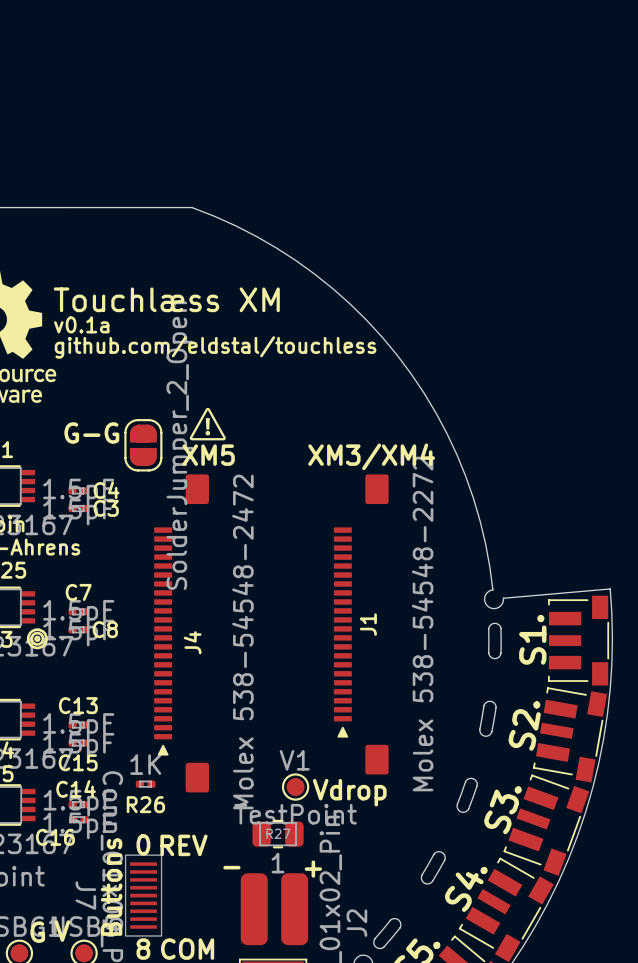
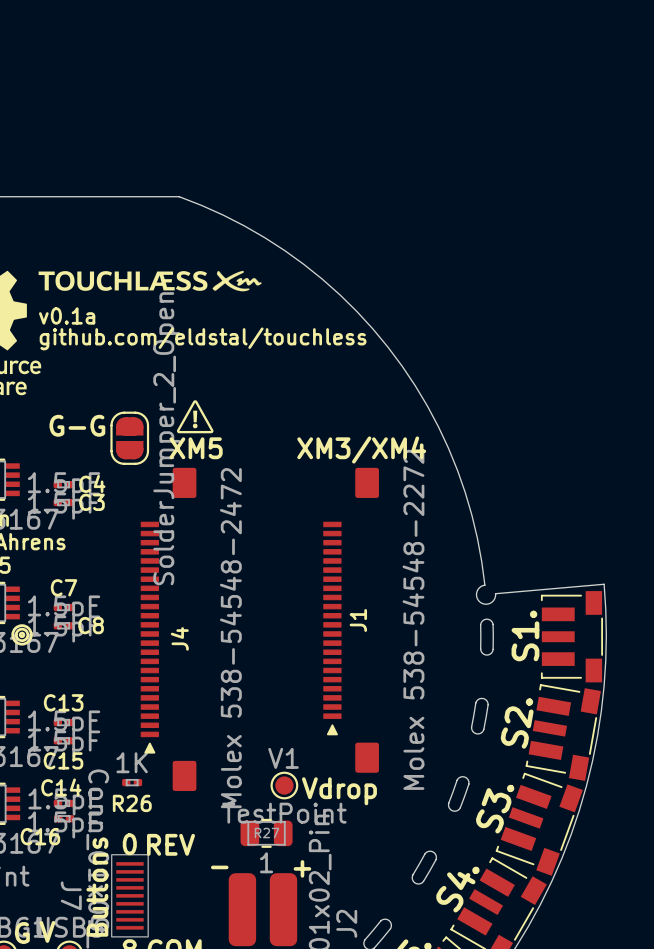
drawing: none -> [38, 270, 262, 292]
text: Touchlæss XM (166, 299) -> none

